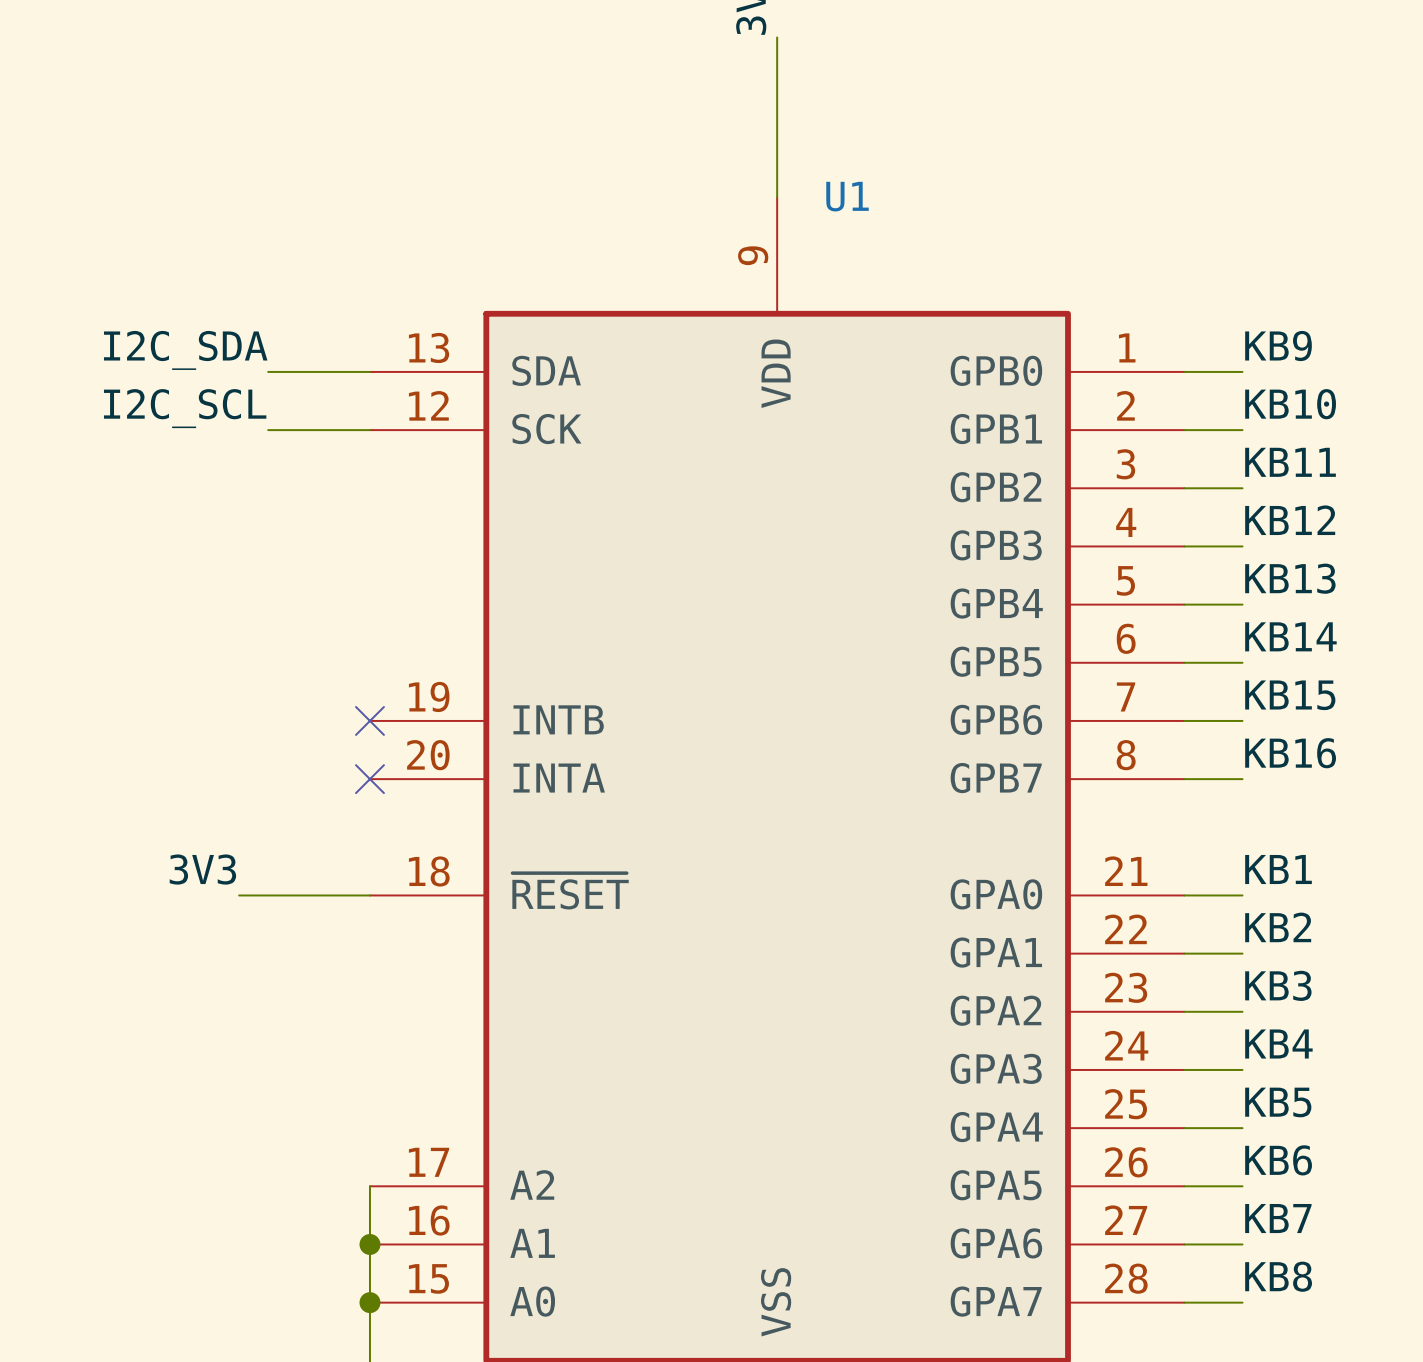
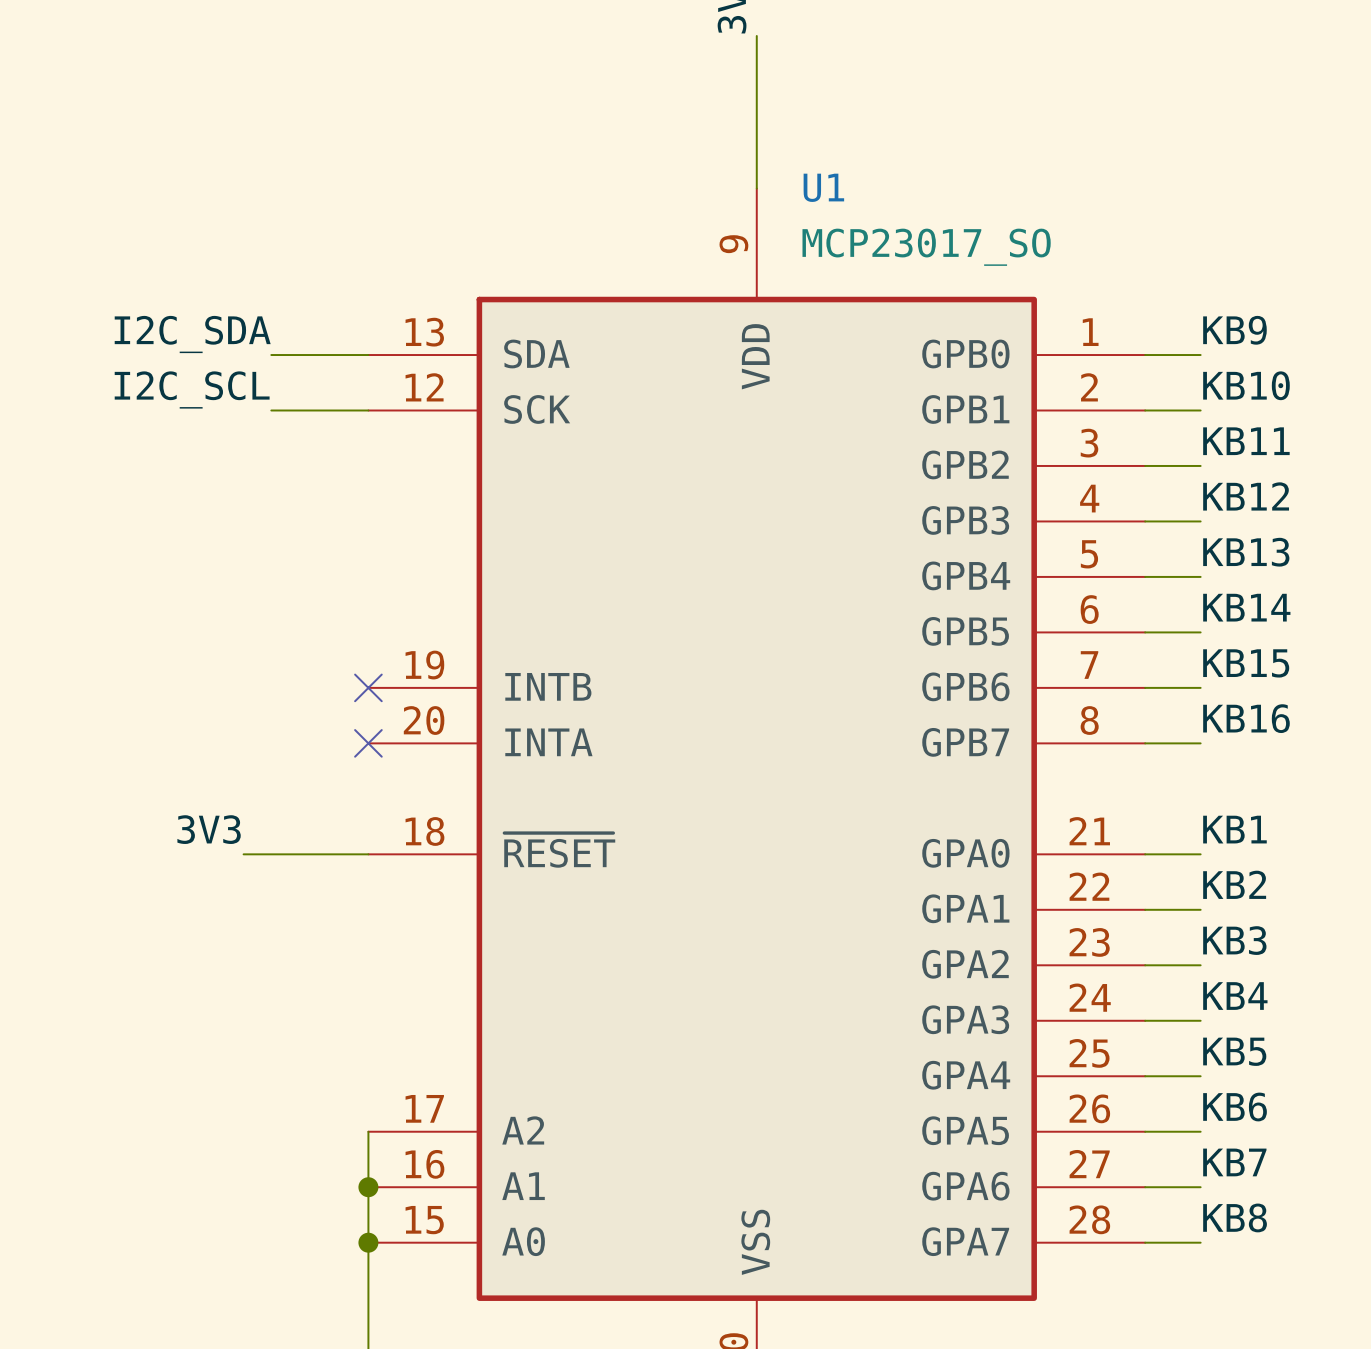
U1 value: none -> MCP23017_SO (926, 247)

